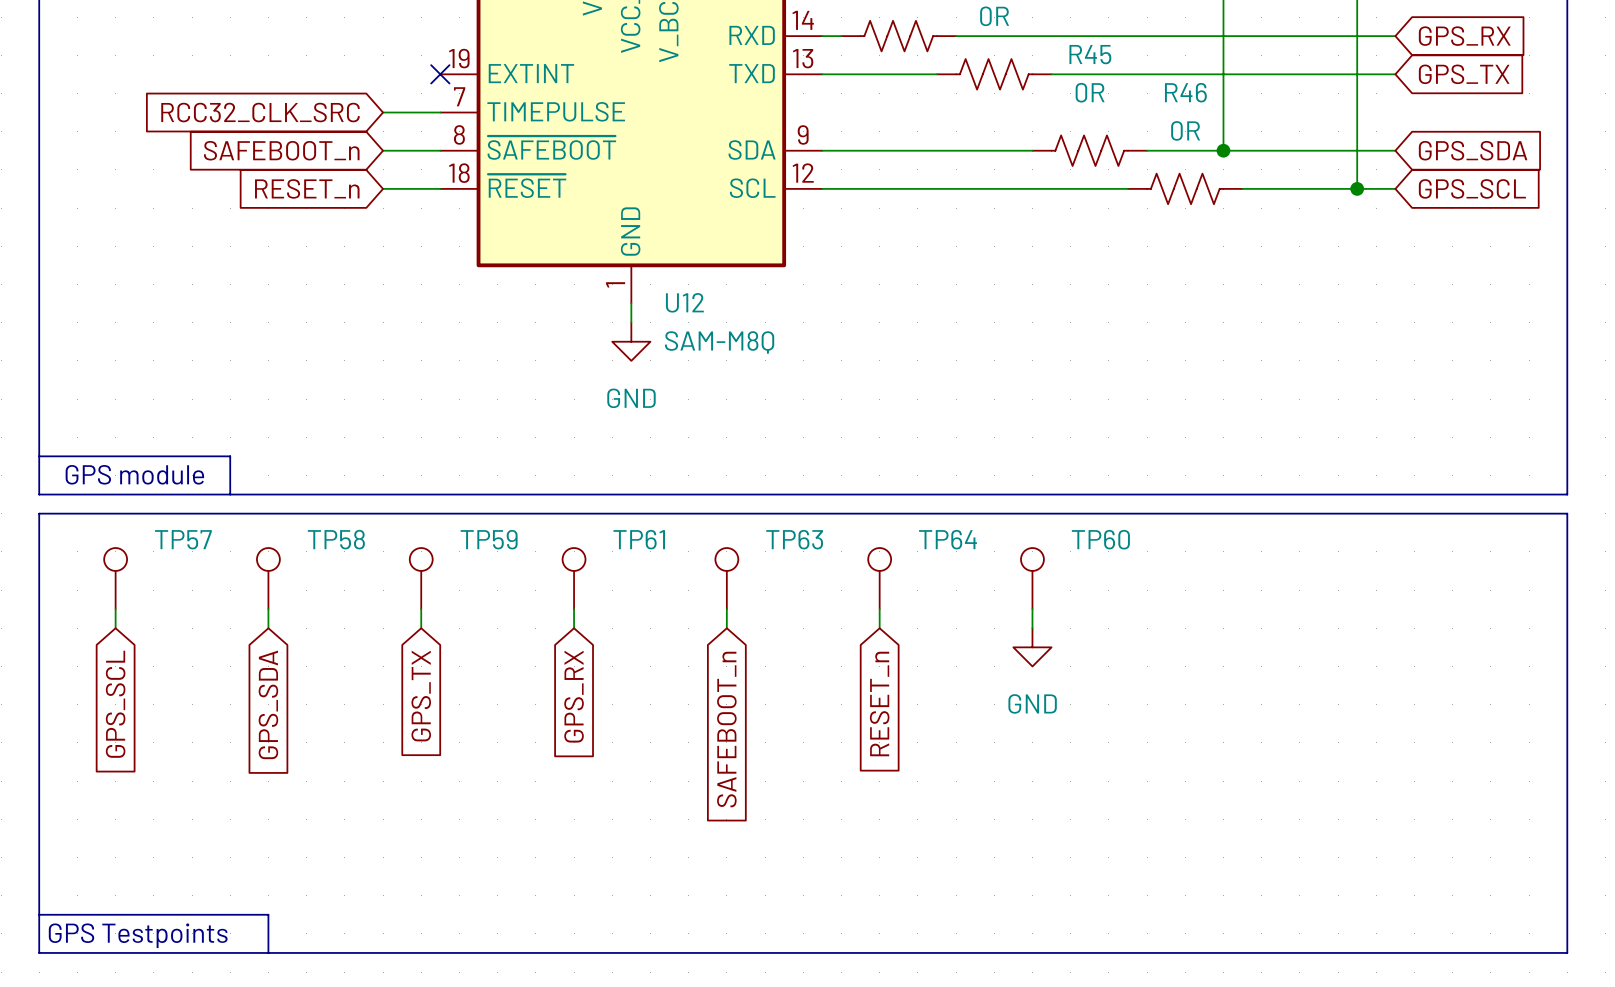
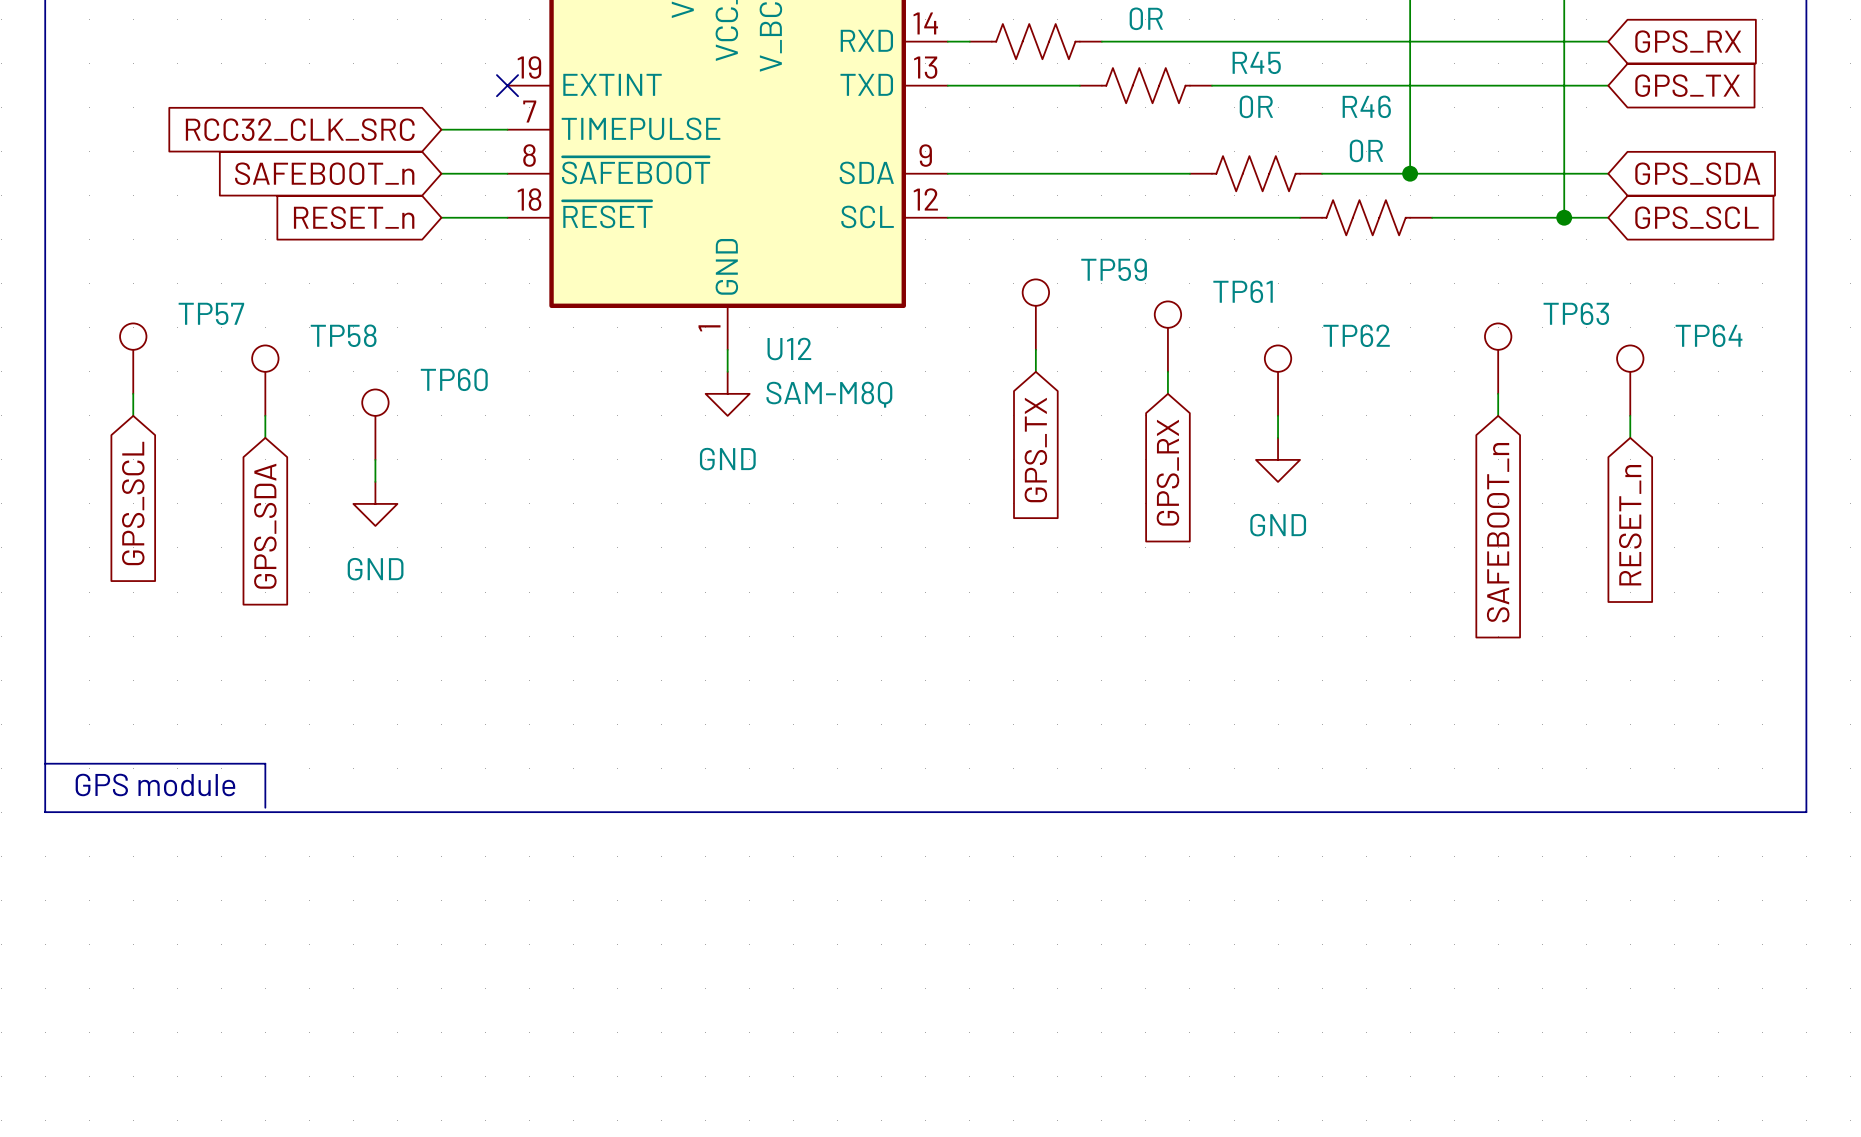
wire: none -> (1167, 371) (1167, 393)
TP62: none -> (1278, 380)
wire: none -> (1498, 393) (1498, 415)
wire: none -> (1630, 415) (1630, 437)
global label: none -> GPS_TX (1035, 450)
global label: none -> GPS_RX (1167, 472)
power symbol: none -> GND (375, 503)
global label: none -> RESET_n (1630, 525)
line: (39, 456) (230, 456) (230, 494) -> (45, 763) (265, 763) (265, 807)
global label: none -> SAFEBOOT_n (1498, 532)
text position: GPS module (134, 474) -> GPS module (155, 784)
line: (39, 494) (1567, 494) -> (45, 569) (45, 592)
line: (39, 513) (1567, 513) -> (1806, 569) (1806, 592)
TP57 position: (115, 578) -> (133, 358)
TP58 position: (268, 578) -> (265, 380)
TP59 position: (421, 578) -> (1035, 314)
TP61 position: (574, 578) -> (1167, 336)
TP63 position: (726, 578) -> (1498, 358)
TP64 position: (879, 578) -> (1630, 380)
TP60 position: (1032, 578) -> (375, 424)
wire: (115, 609) (115, 628) -> (133, 393) (133, 415)
wire: (268, 609) (268, 628) -> (375, 459) (375, 481)
wire: (421, 609) (421, 628) -> (265, 415) (265, 437)
wire: (574, 609) (574, 628) -> none
wire: (726, 609) (726, 628) -> none
wire: (879, 609) (879, 628) -> (1035, 349) (1035, 371)
wire: (1032, 609) (1032, 628) -> (1278, 415) (1278, 437)
power symbol position: GND (1032, 647) -> GND (1278, 459)
global label: GPS_TX (421, 696) -> none
global label: GPS_RX (574, 696) -> none
line: (39, 704) (39, 952) (1567, 952) (1567, 704) -> (45, 812) (1806, 812)
global label position: GPS_SCL (115, 704) -> GPS_SCL (133, 503)
global label position: GPS_SDA (268, 704) -> GPS_SDA (265, 526)
global label: RESET_n (879, 704) -> none
global label: SAFEBOOT_n (726, 729) -> none
line: (39, 914) (268, 914) (268, 952) -> none
text: GPS Testpoints (138, 935) -> none

